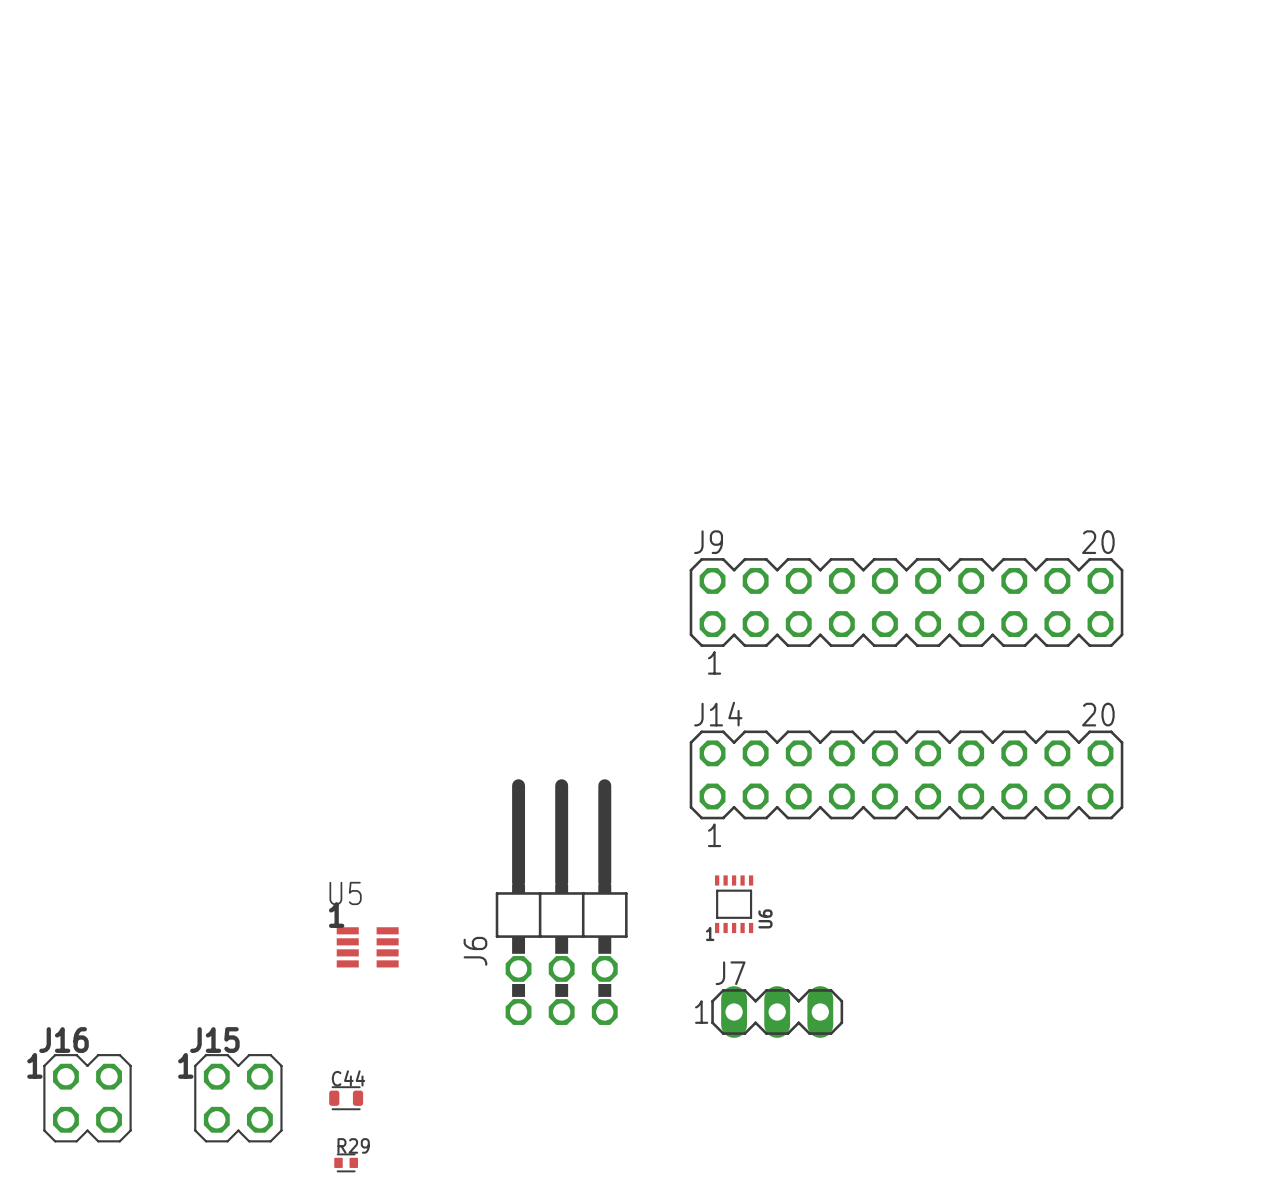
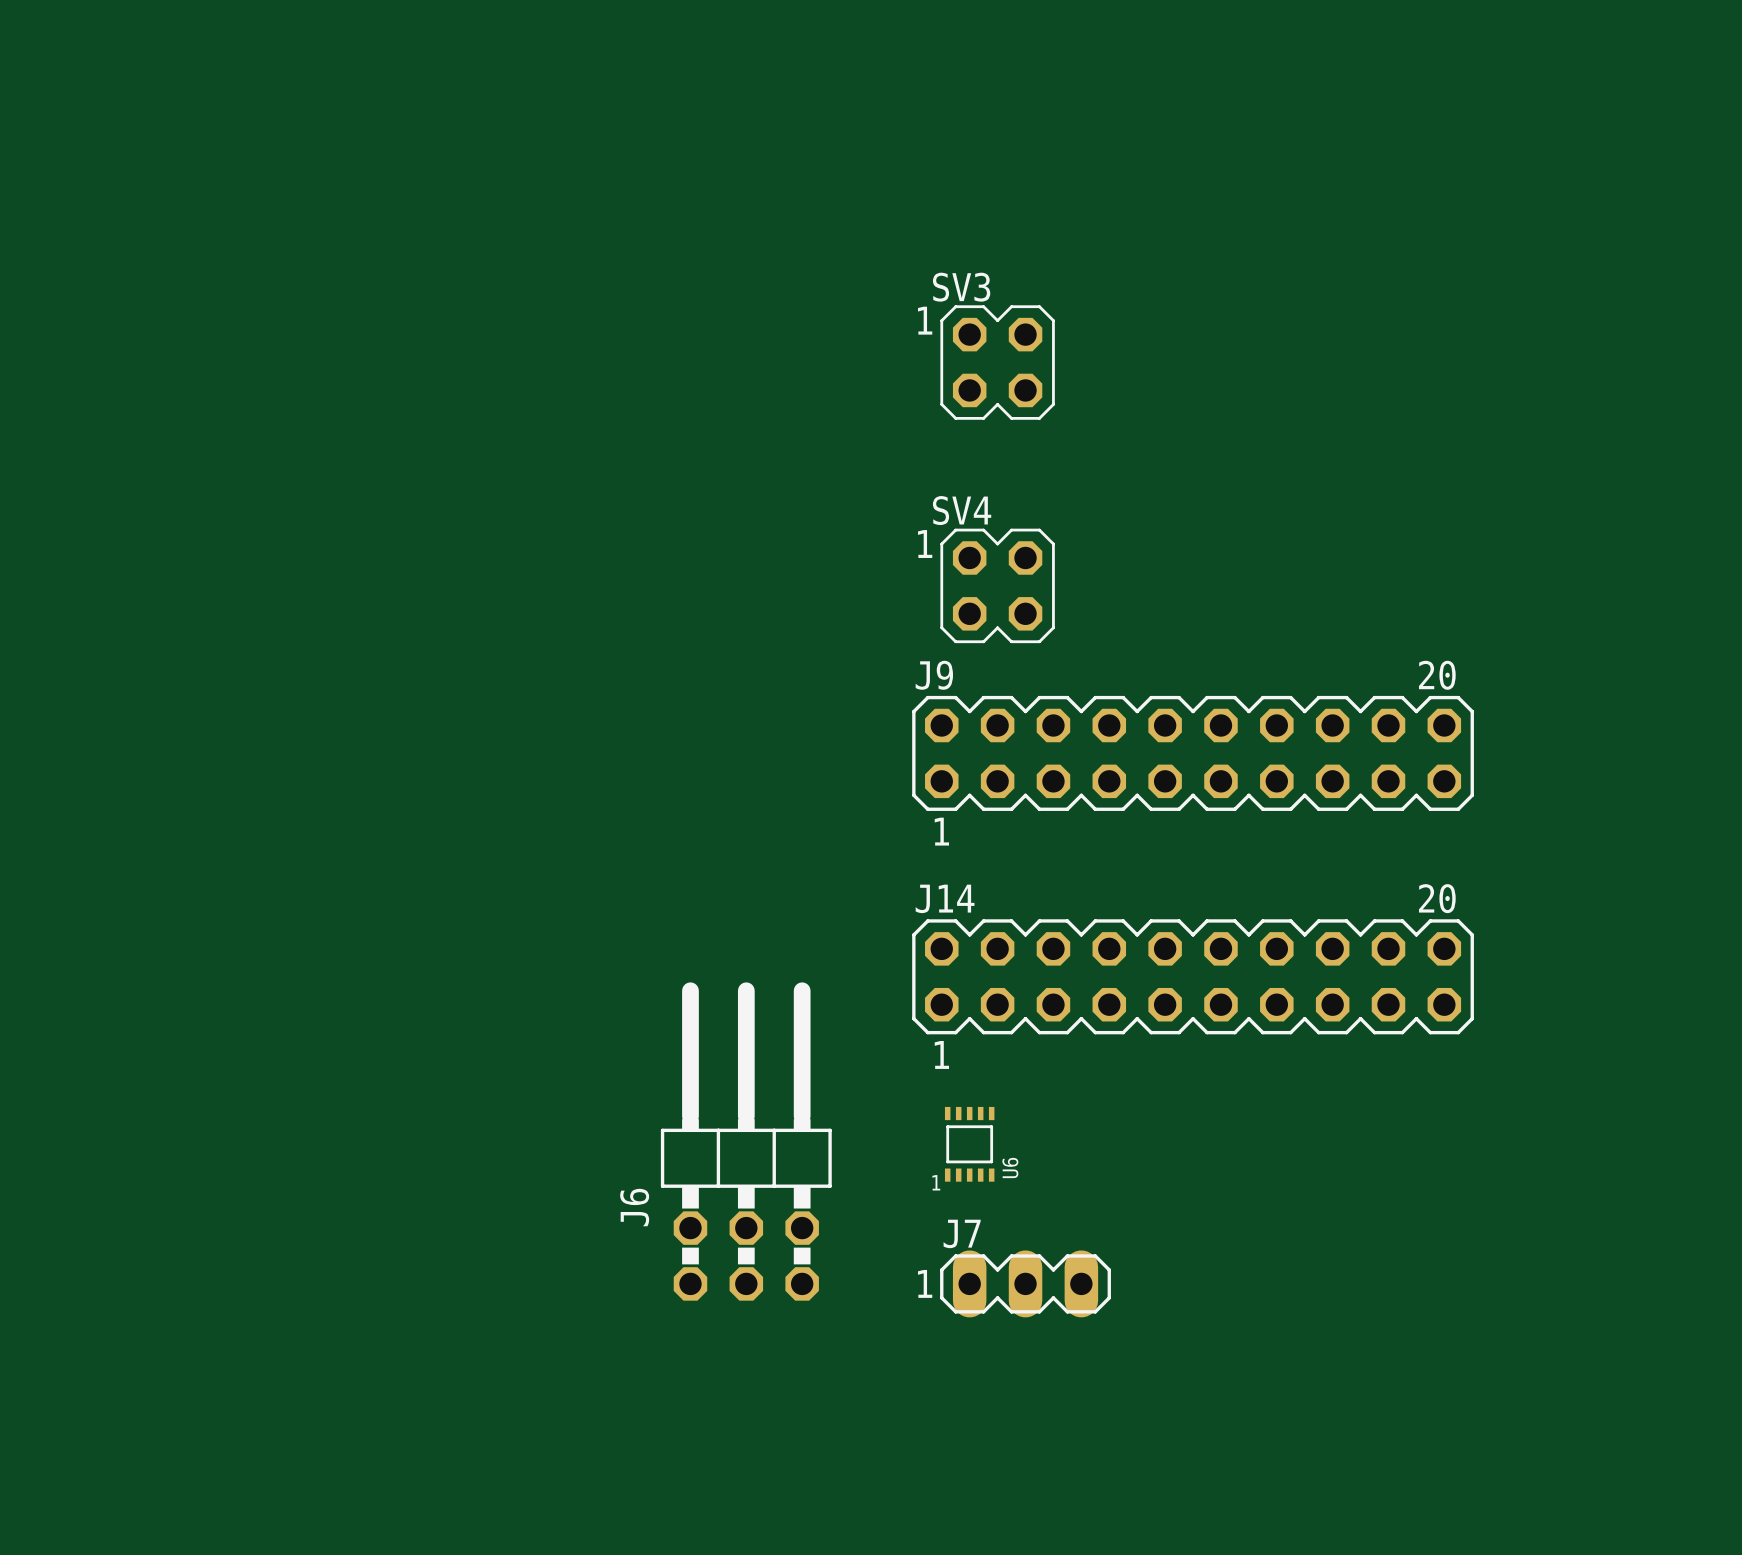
SV3: none -> (997, 362)
SV4: none -> (997, 585)
U5: (367, 947) -> none
J16: (87, 1098) -> none
J15: (238, 1098) -> none
C44: (346, 1098) -> none
R29: (346, 1162) -> none

